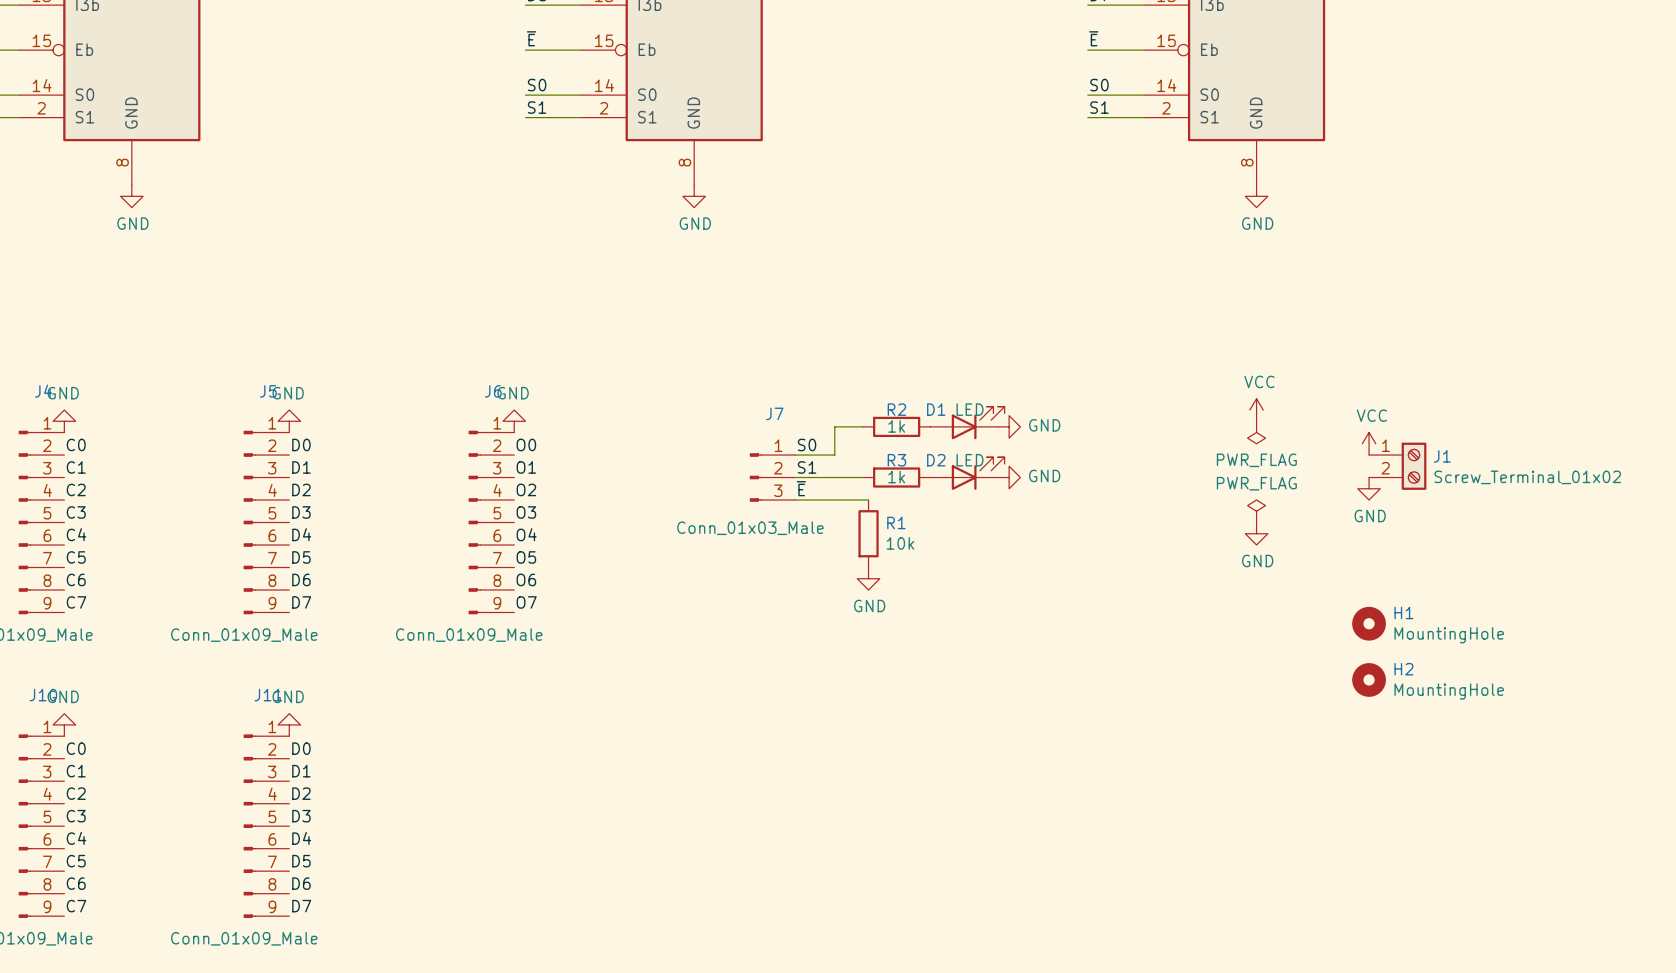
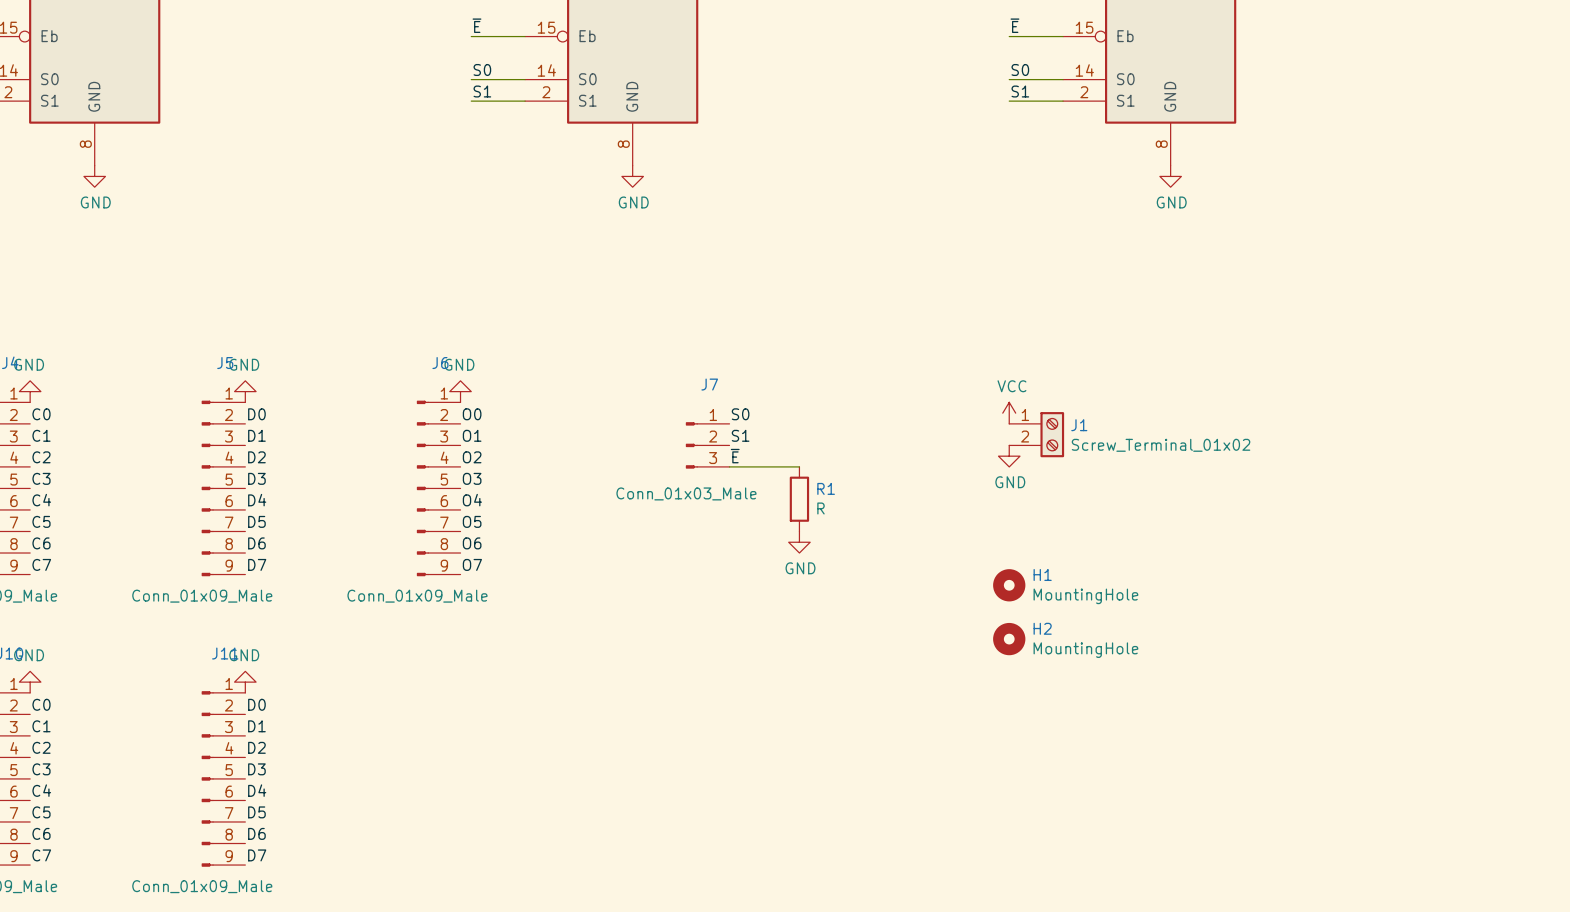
power symbol: VCC (1256, 410) -> none
D1: LED (967, 422) -> none
wire: (862, 426) (834, 426) (834, 455) (795, 455) -> none
R2: 1k (896, 426) -> none
power symbol: GND (1009, 426) -> none
power symbol: PWR_FLAG (1256, 432) -> none
power symbol: none -> VCC (1009, 413)
power symbol: VCC (1369, 443) -> none
J1 position: (1397, 466) -> (1036, 434)
D2: LED (967, 473) -> none
wire: (795, 477) (862, 477) -> none
R3: 1k (896, 477) -> none
power symbol: GND (1009, 477) -> none
power symbol: none -> GND (1009, 456)
power symbol: GND (1369, 488) -> none
power symbol: PWR_FLAG (1256, 511) -> none
power symbol: GND (1256, 533) -> none
R1 value: 10k (900, 543) -> R (820, 508)
H1 position: (1369, 623) -> (1009, 585)
H2 position: (1369, 679) -> (1009, 639)

